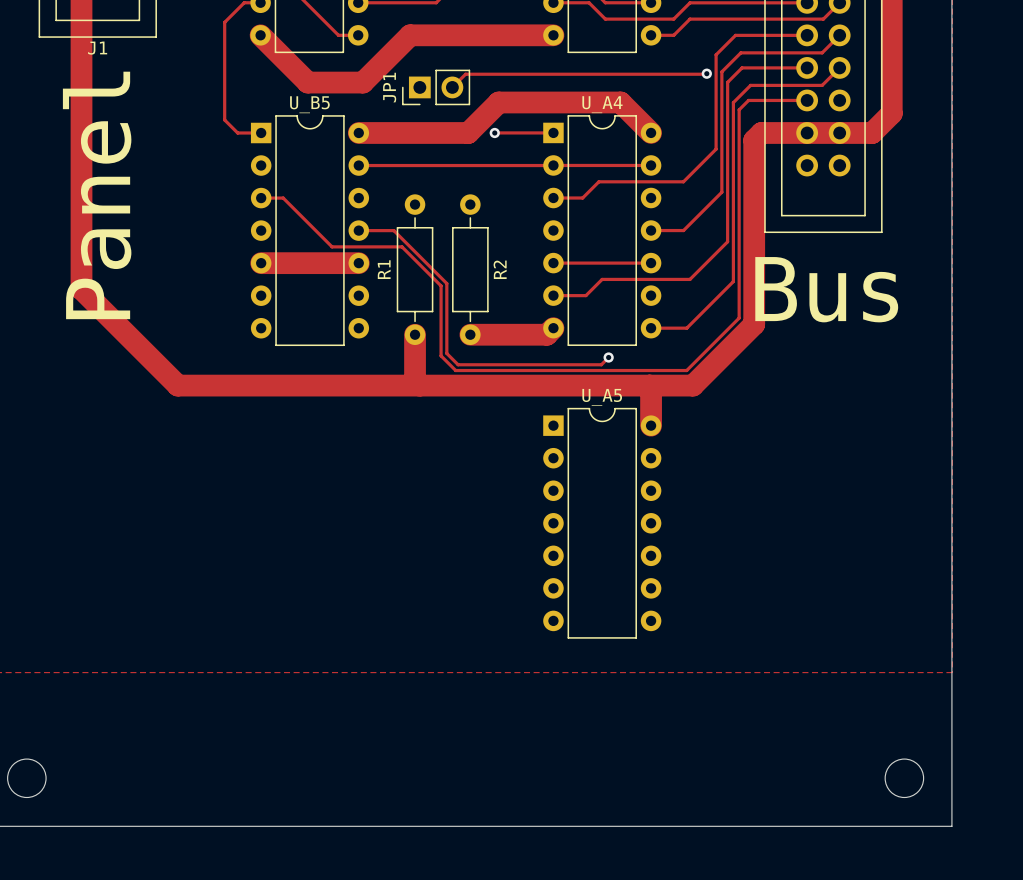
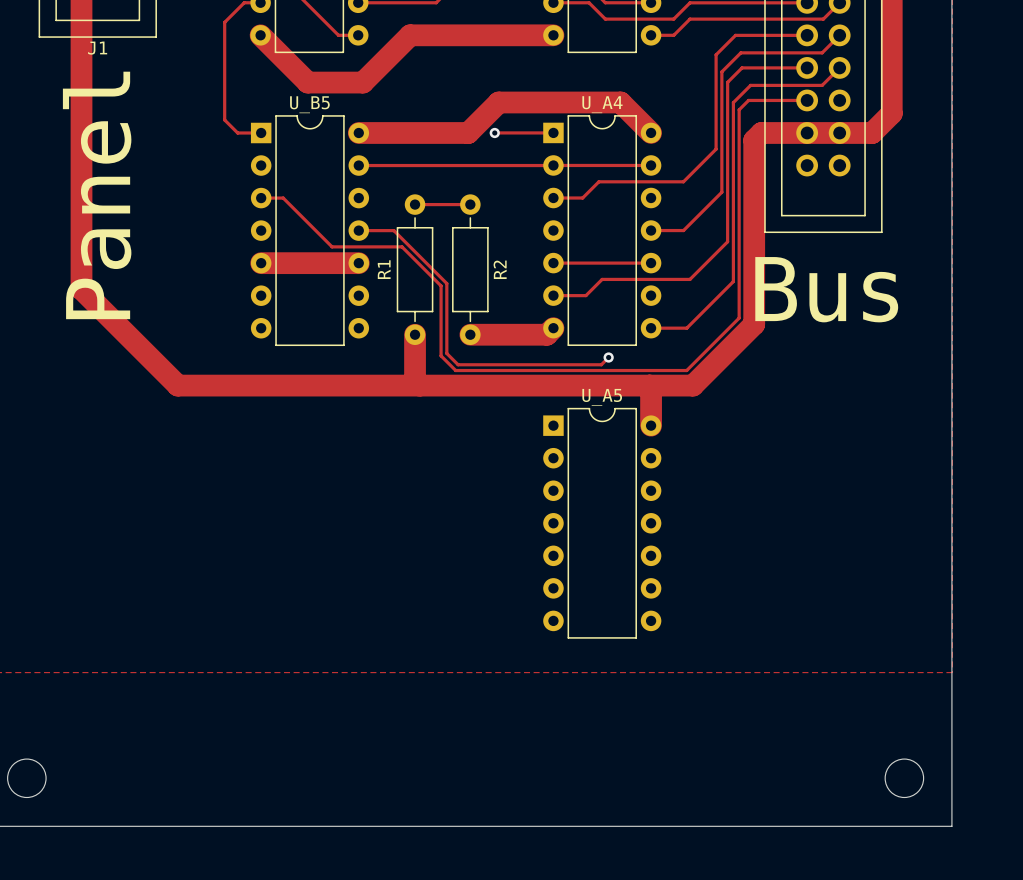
track: (706, 73) (465, 74) (452, 87) -> none
via: (706, 73) -> none
JP1: (436, 87) -> none
track: none -> (415, 204) (470, 204)

